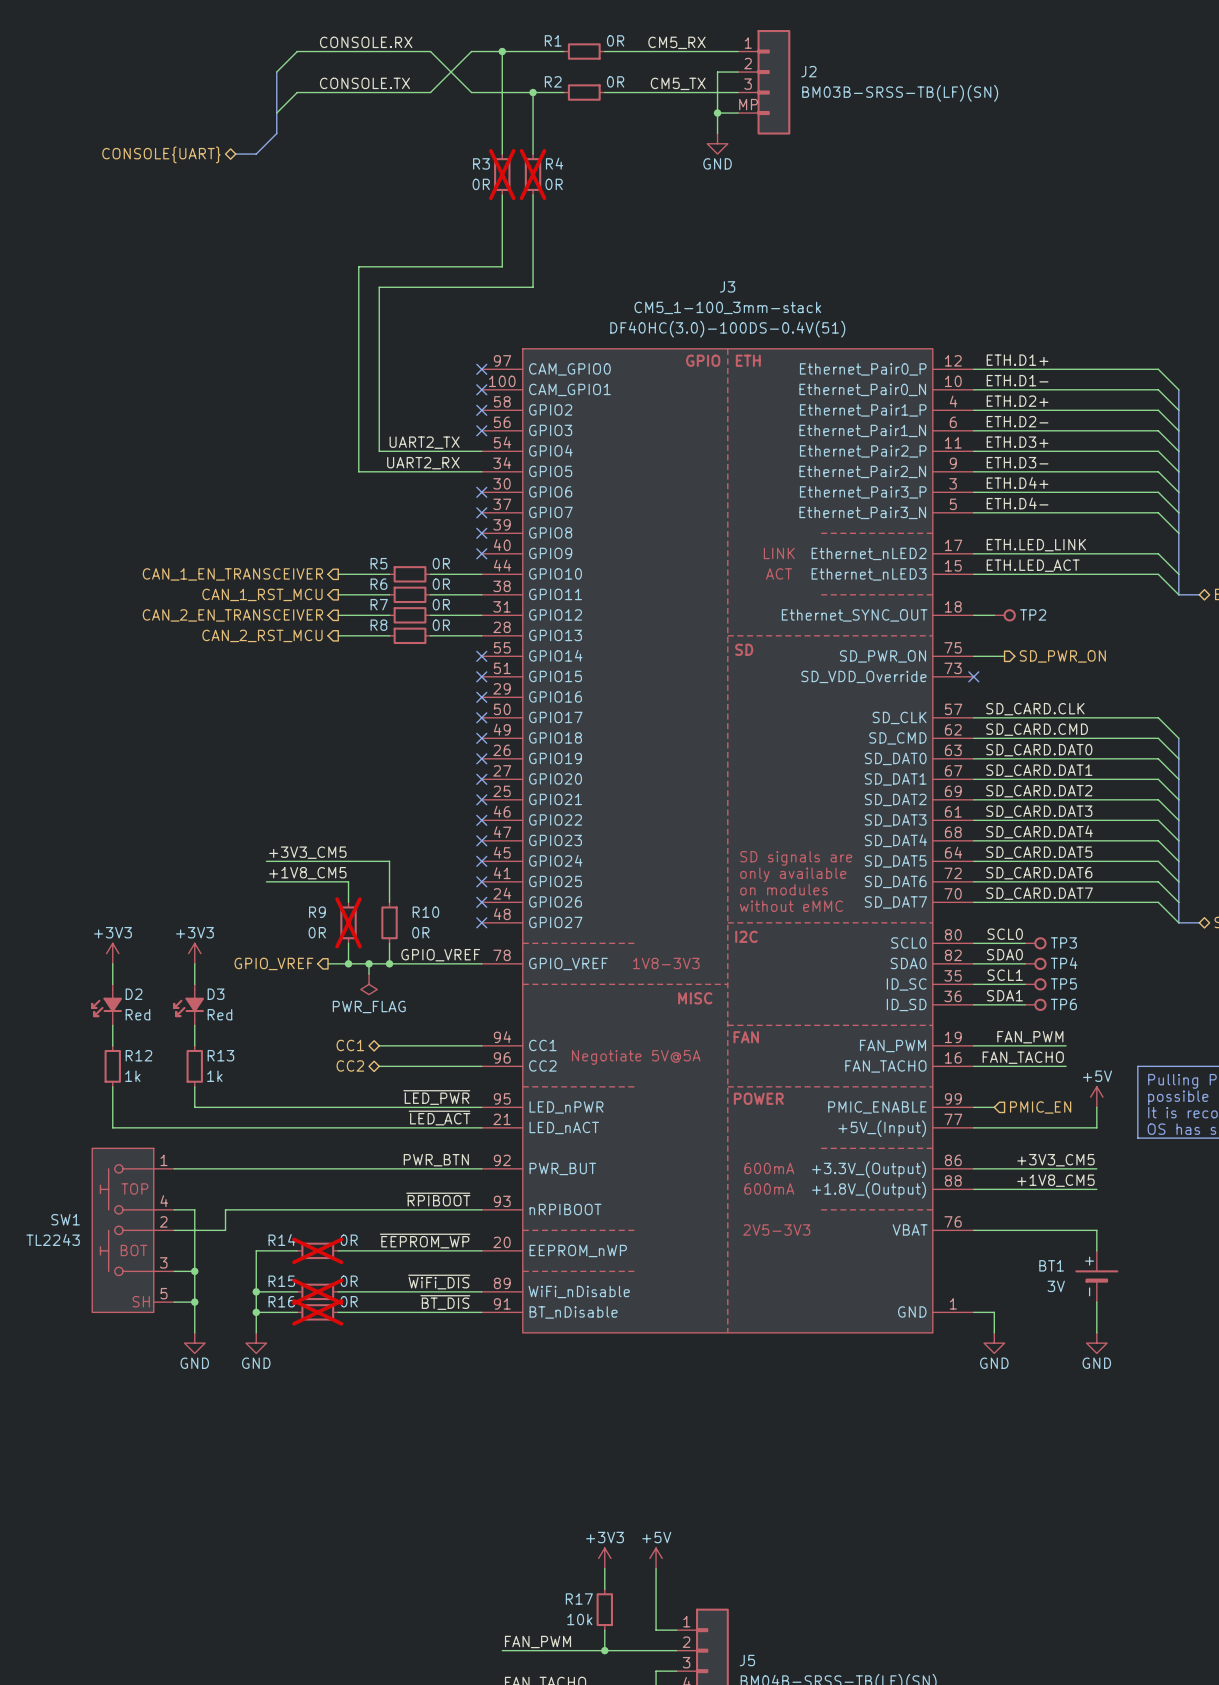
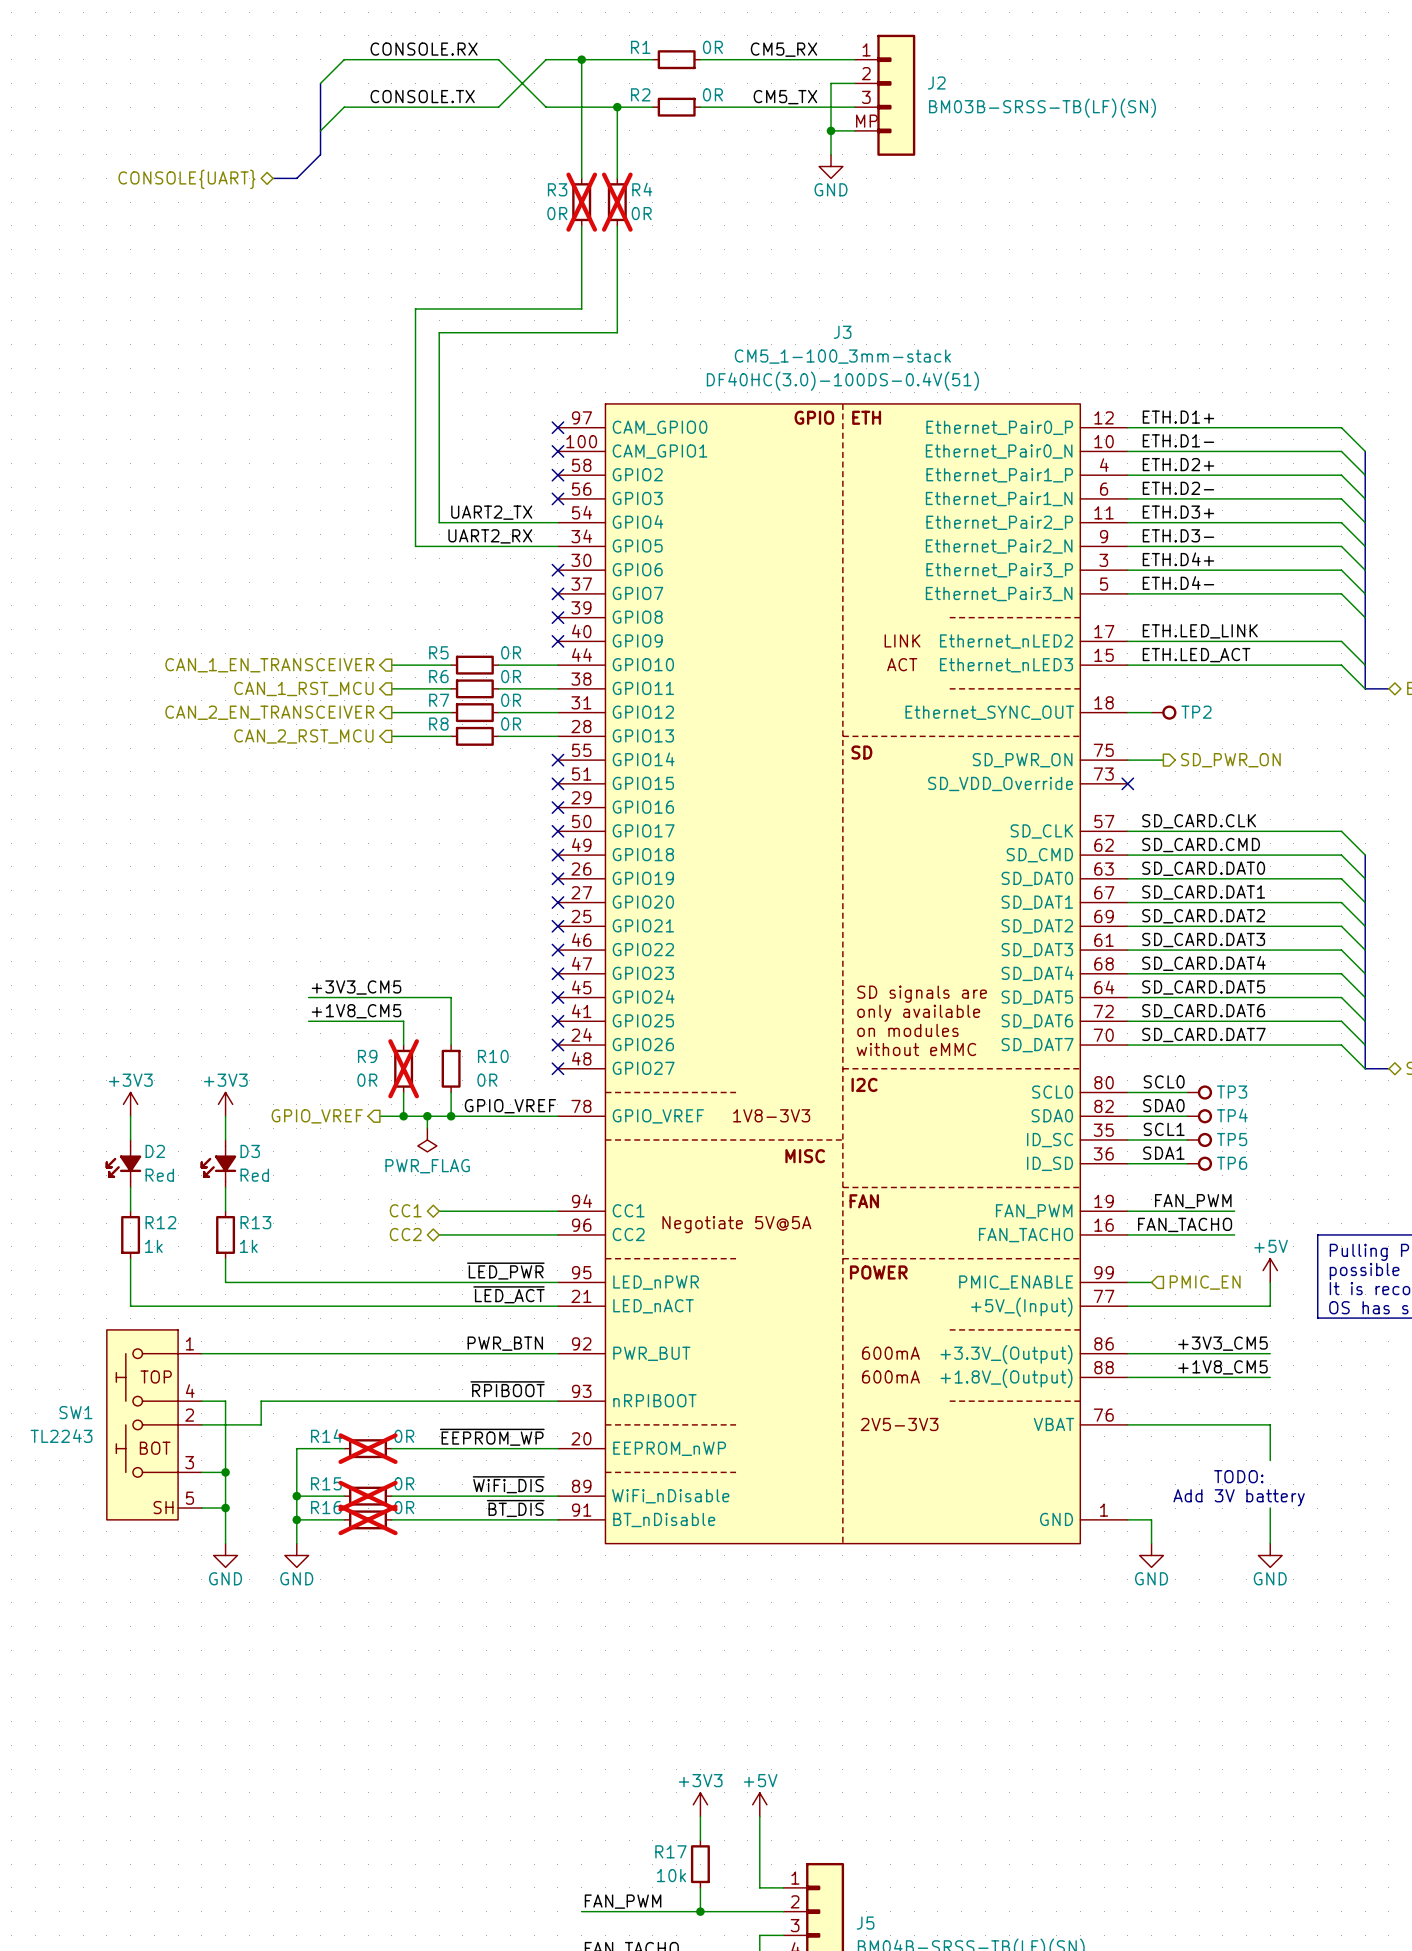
text: none -> TODO: (1238, 1476)
BT1: (1096, 1276) -> none
text: none -> Add 3V battery (1239, 1497)

